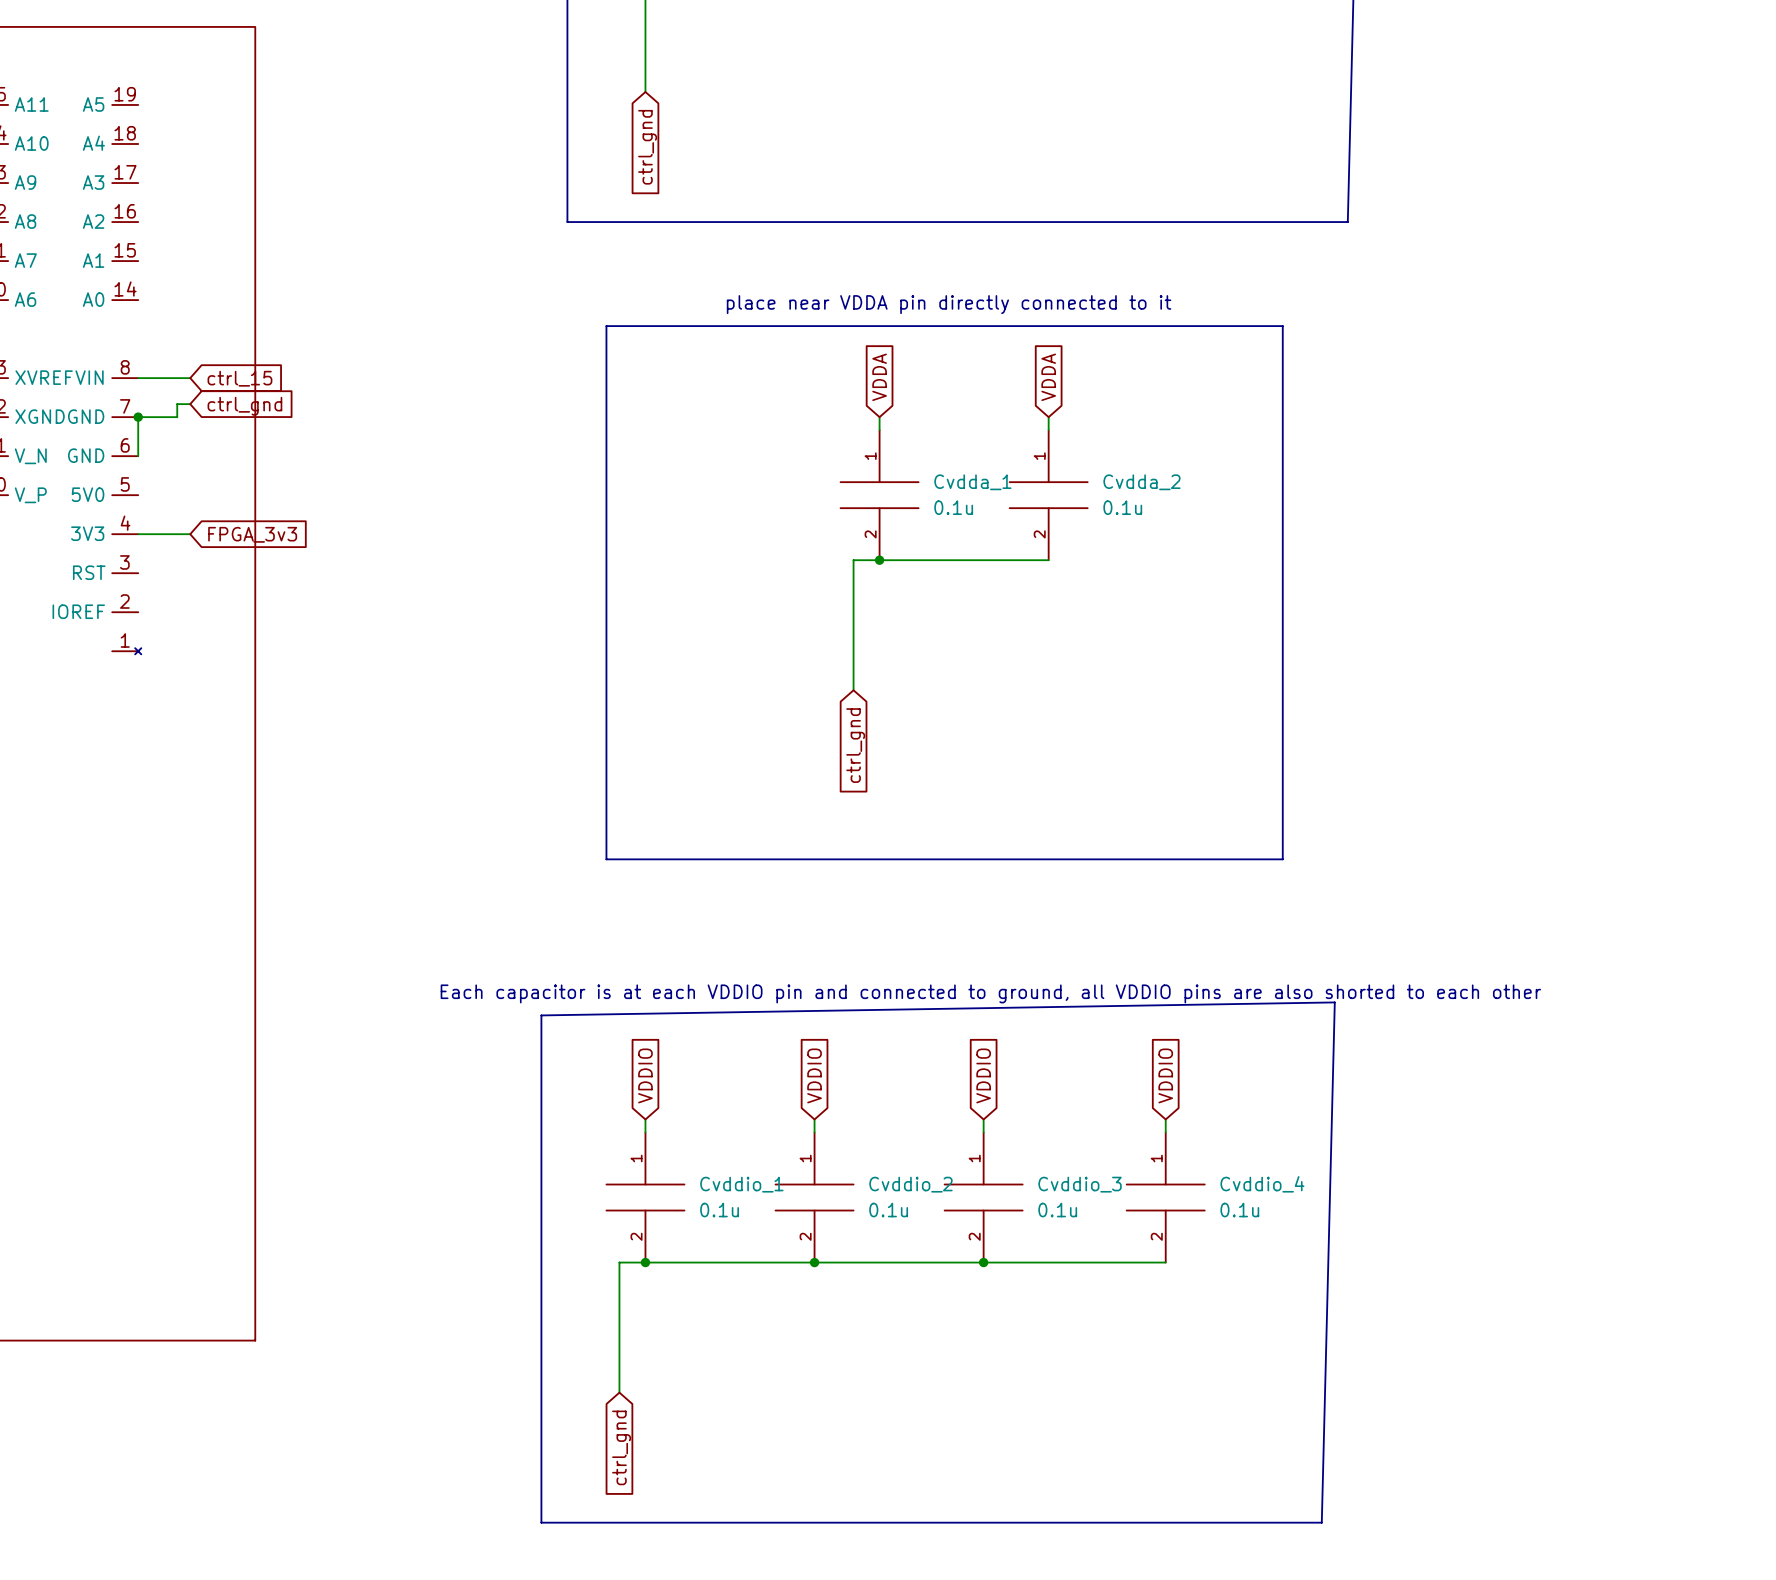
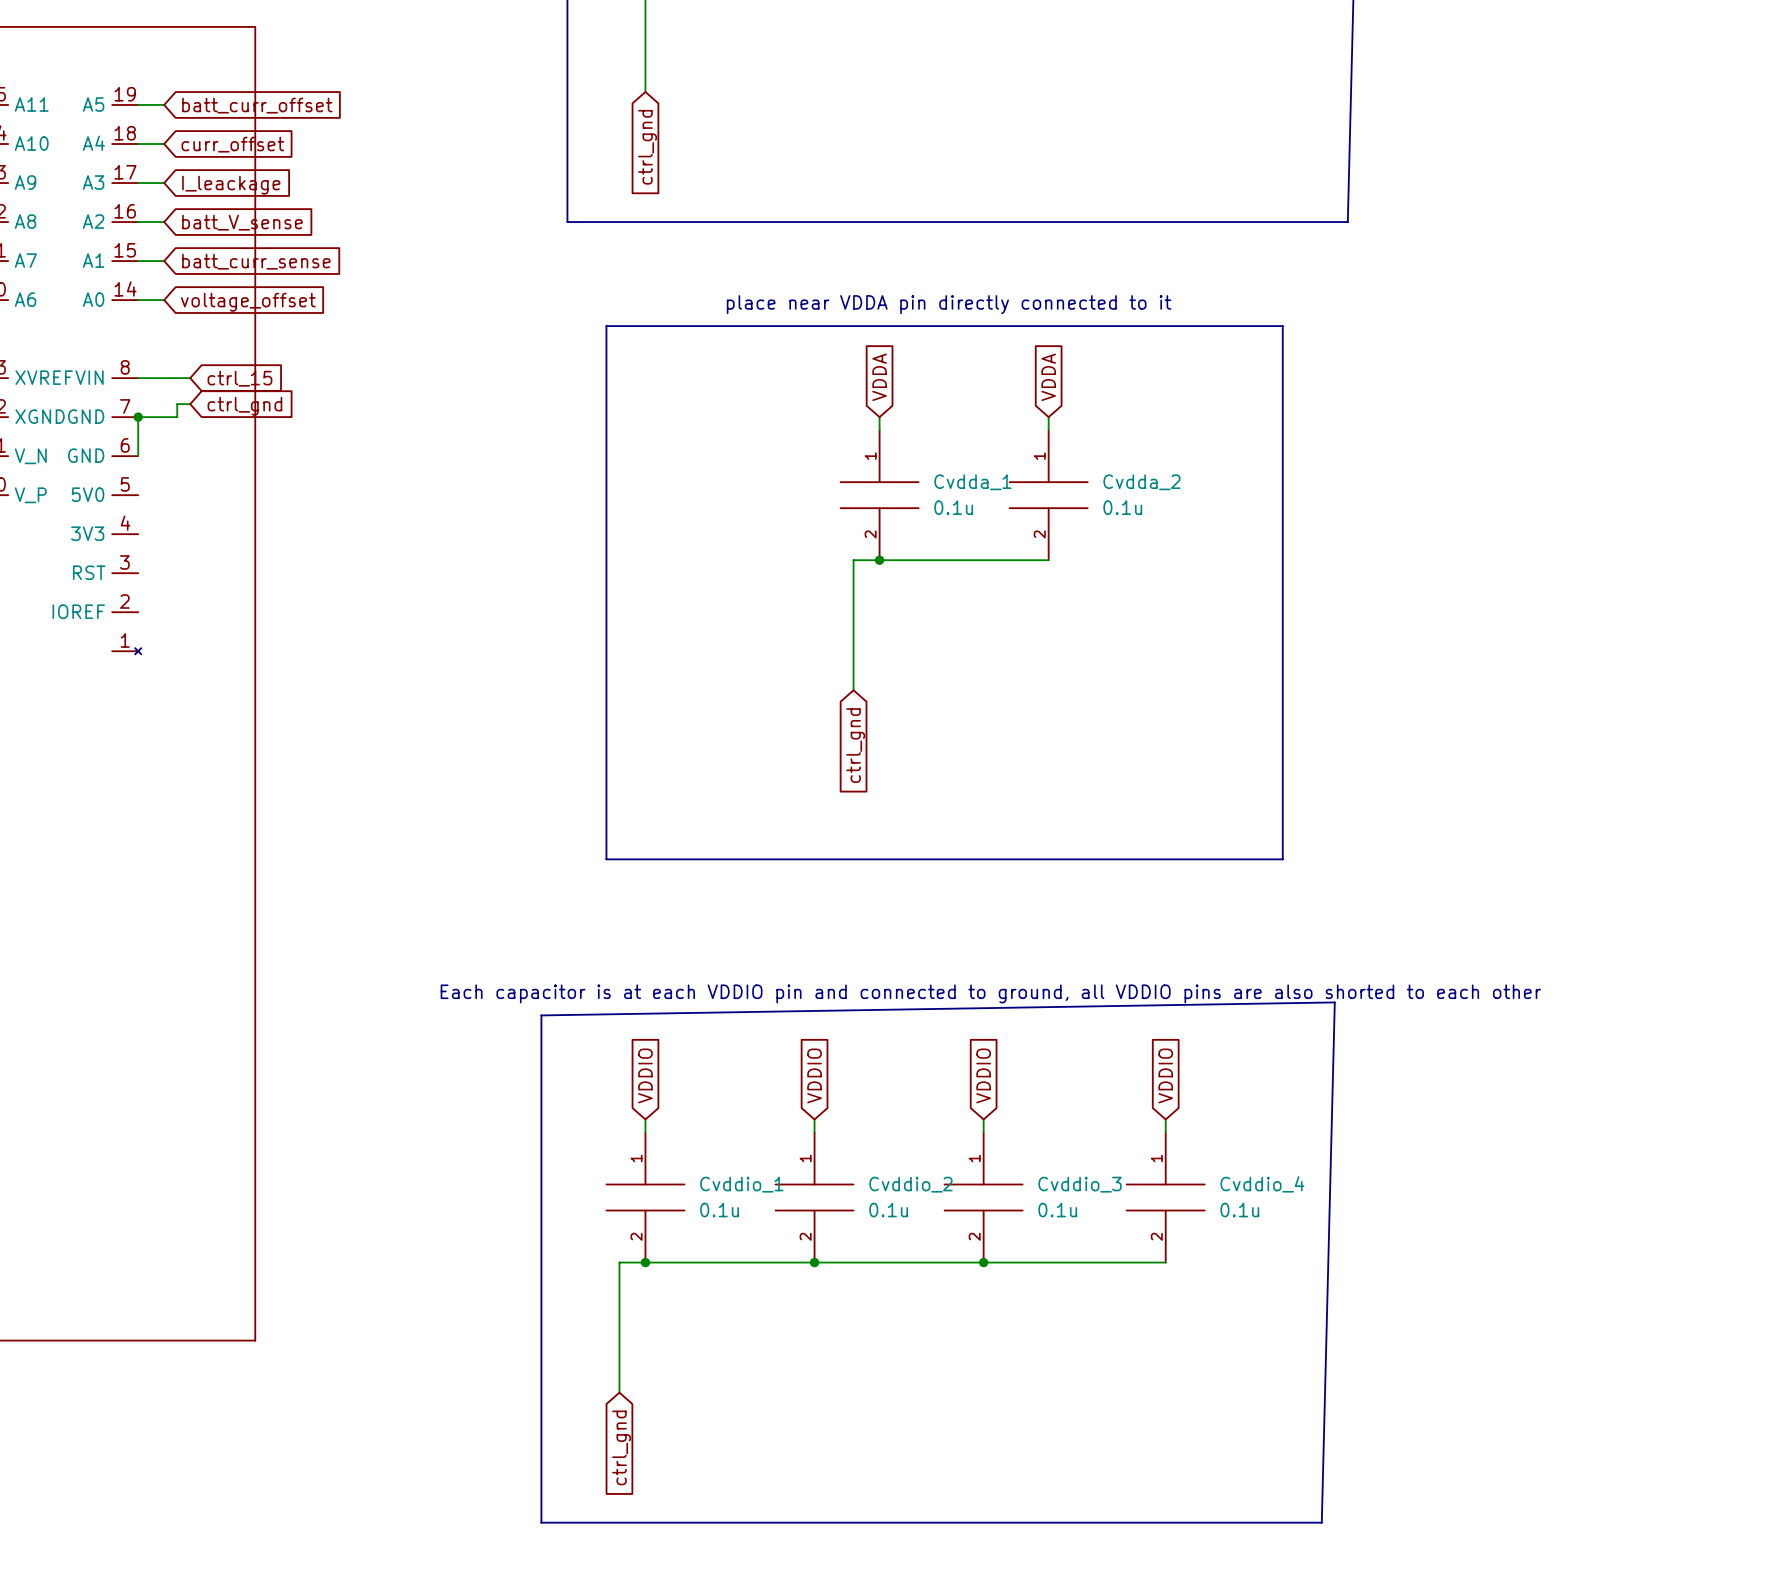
wire: none -> (138, 104) (164, 104)
global label: none -> batt_curr_offset (257, 105)
wire: none -> (138, 144) (164, 144)
global label: none -> curr_offset (232, 144)
wire: none -> (138, 183) (164, 183)
global label: none -> I_leackage (231, 185)
wire: none -> (138, 222) (164, 222)
global label: none -> batt_V_sense (242, 222)
wire: none -> (138, 261) (164, 261)
global label: none -> batt_curr_sense (256, 261)
wire: none -> (138, 300) (164, 300)
global label: none -> voltage_offset (248, 302)
wire: (138, 534) (190, 534) -> none
global label: FPGA_3v3 (252, 534) -> none

